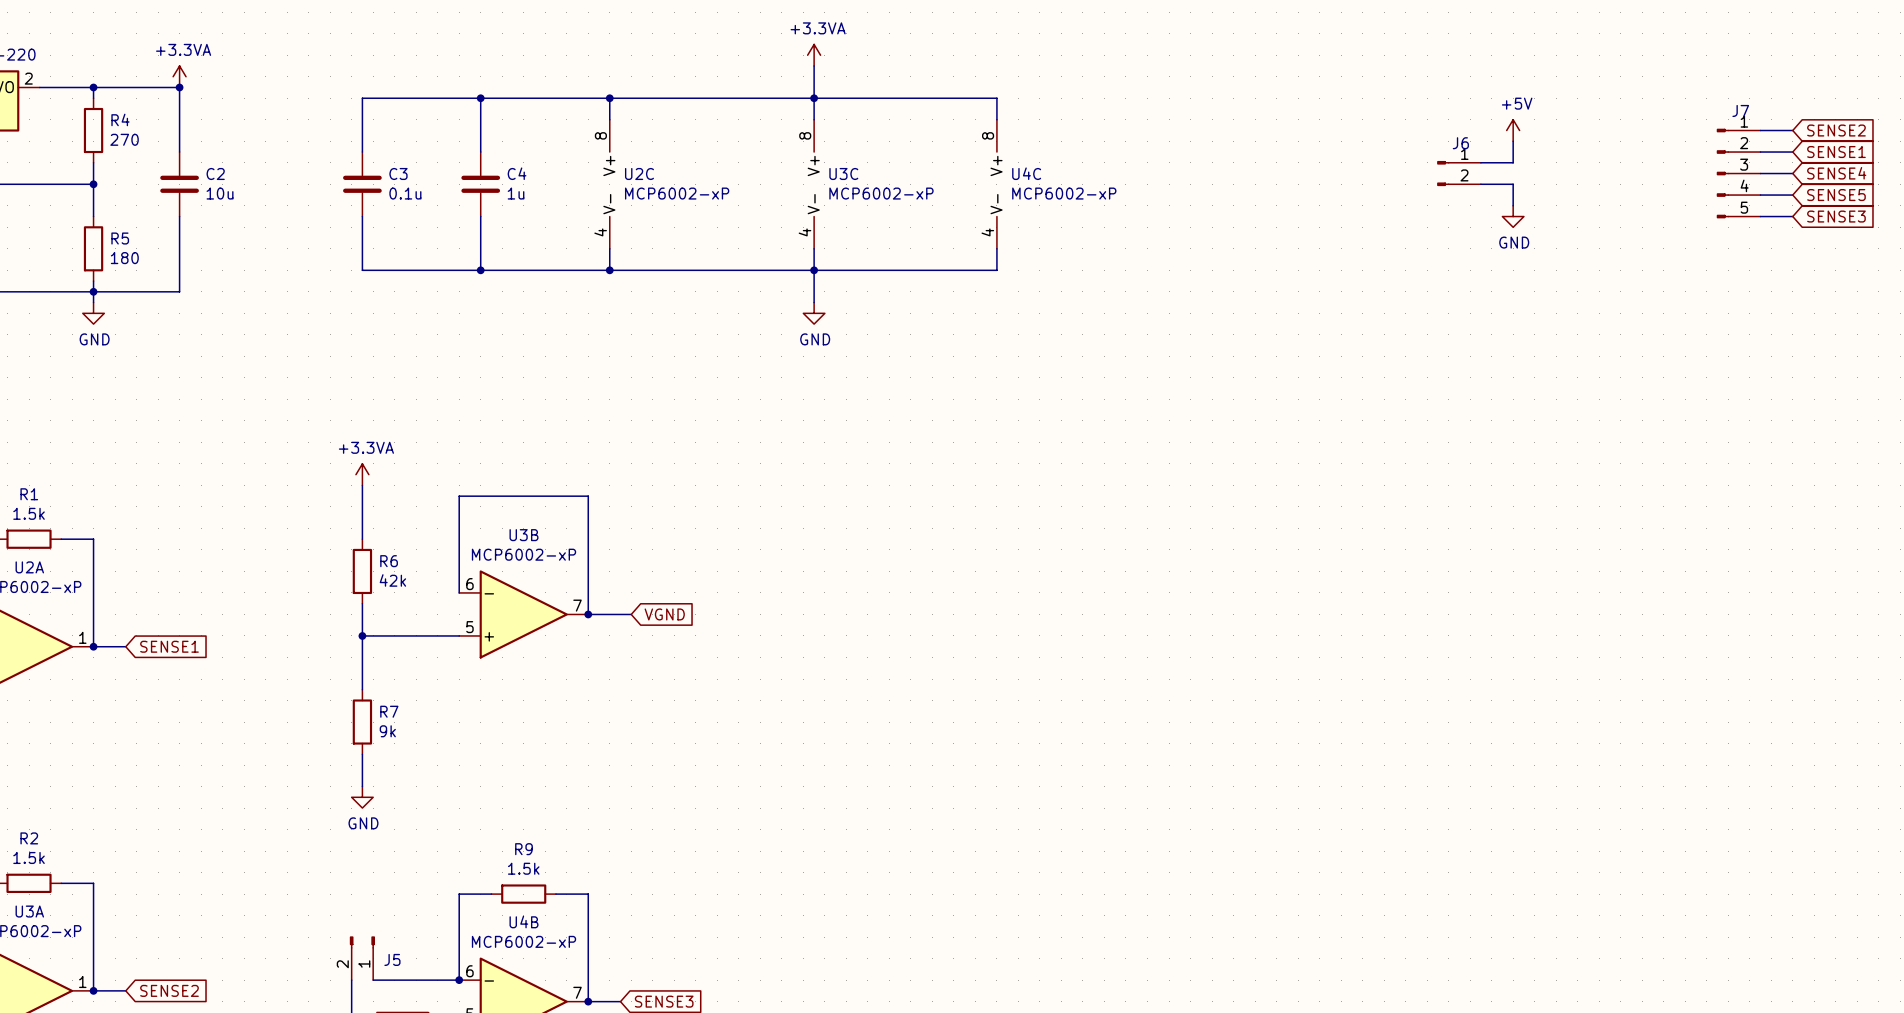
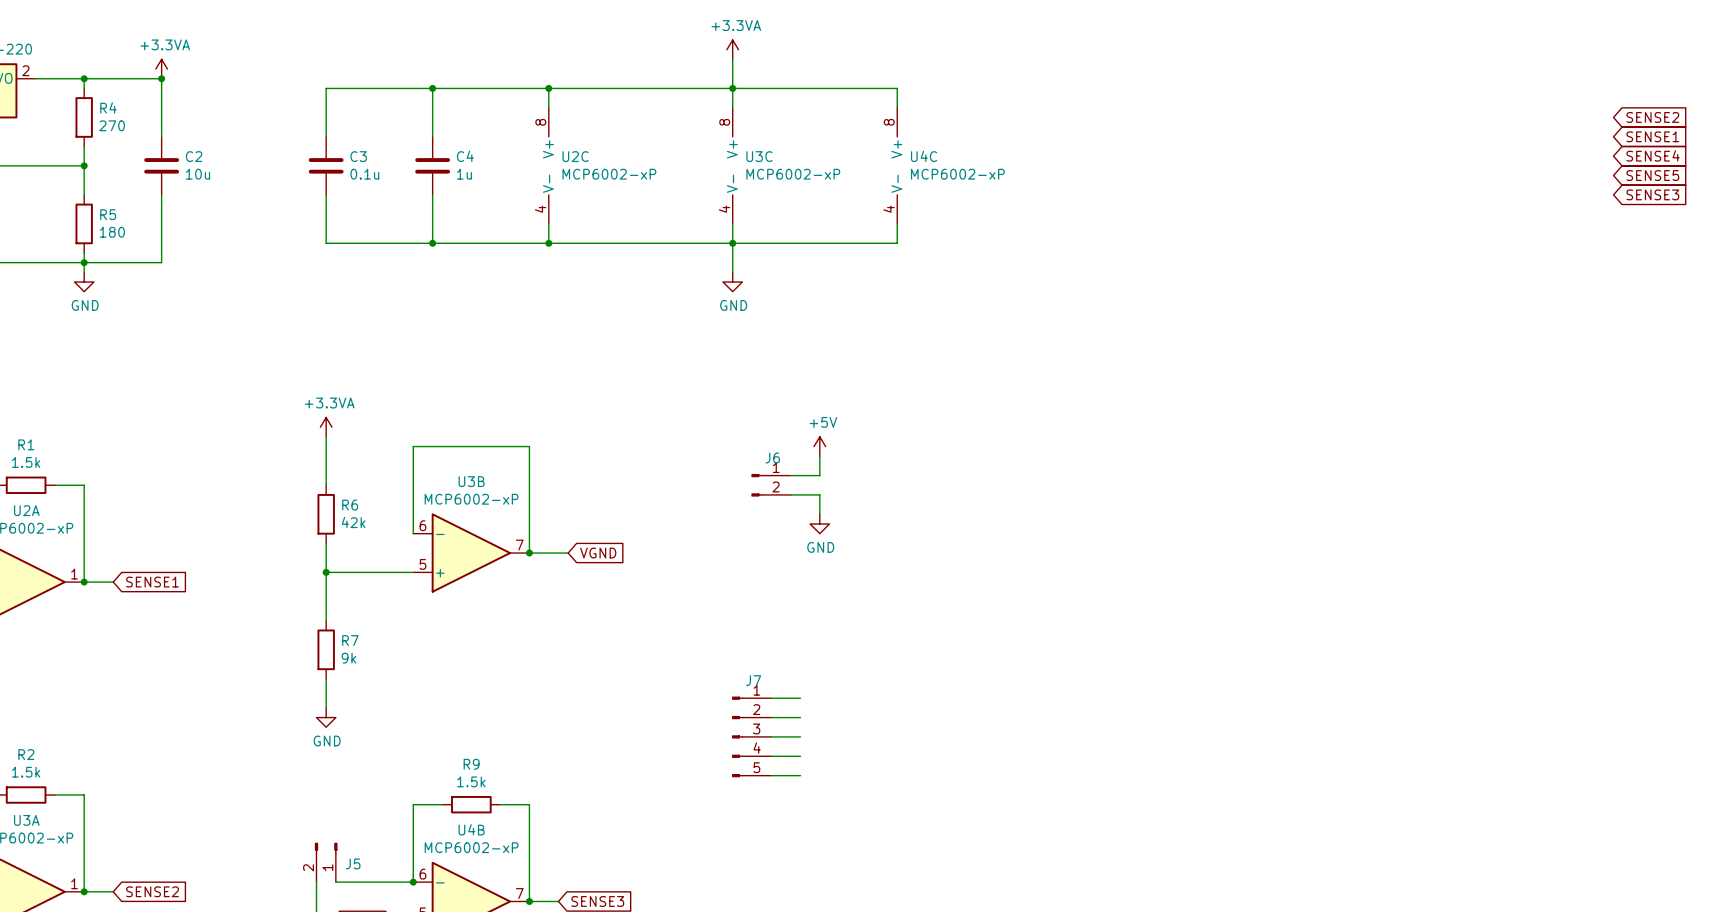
power symbol: +5V (1513, 130) -> none
wire: (1760, 130) (1792, 130) -> none
wire: (1513, 141) (1513, 162) (1480, 162) -> none
wire: (1760, 152) (1792, 152) -> none
J6 position: (1459, 173) -> (771, 485)
J7 position: (1738, 173) -> (751, 736)
wire: (1760, 173) (1792, 173) -> none
wire: (1480, 184) (1513, 184) (1513, 205) -> none
wire: (1760, 195) (1792, 195) -> none
power symbol: GND (1513, 216) -> none
wire: (1760, 216) (1792, 216) -> none
power symbol: none -> +5V (819, 446)
wire: none -> (819, 456) (819, 475) (790, 475)
wire: none -> (790, 494) (819, 494) (819, 514)
power symbol: none -> GND (819, 523)
wire: none -> (771, 698) (800, 698)
wire: none -> (771, 717) (800, 717)
wire: none -> (771, 736) (800, 736)
wire: none -> (771, 756) (800, 756)
wire: none -> (771, 775) (800, 775)

